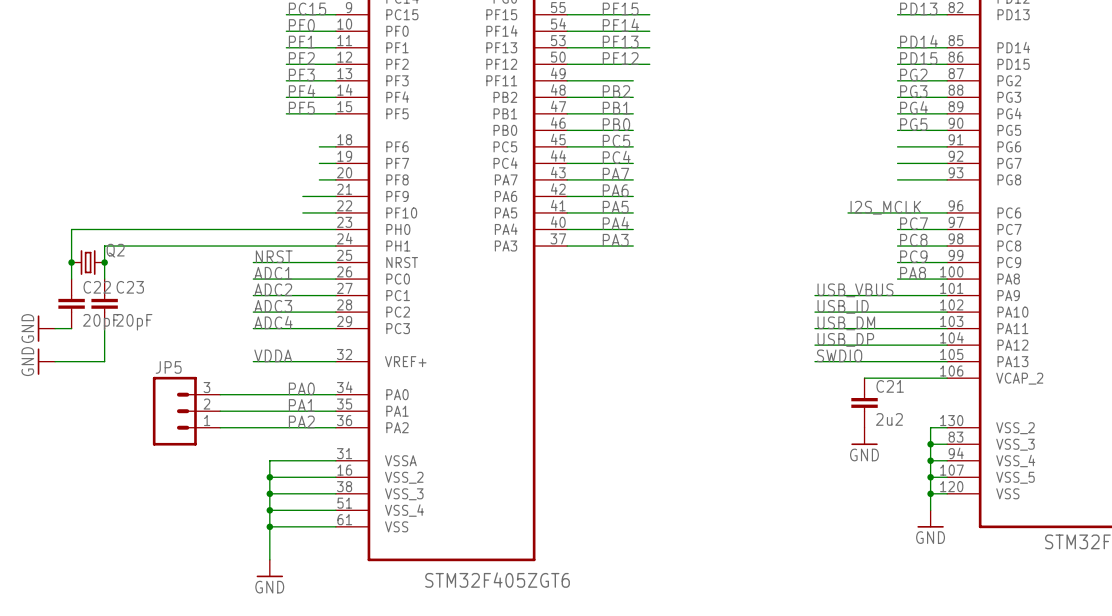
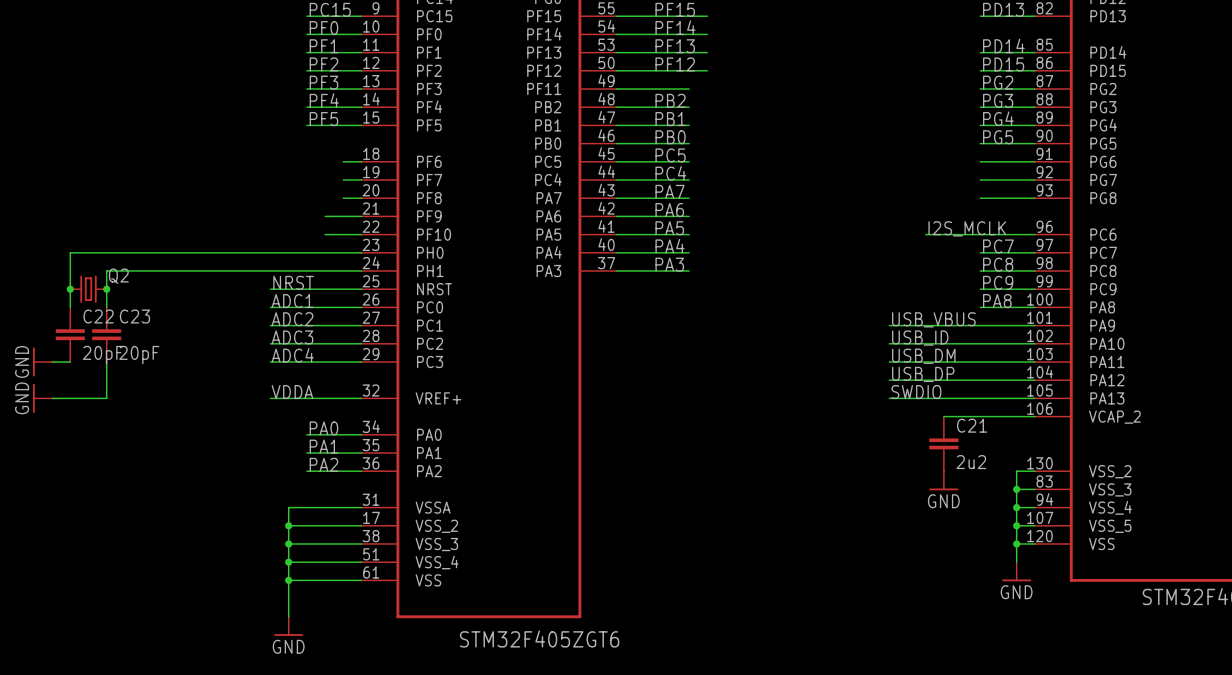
wire: (220, 394) (286, 394) -> none
JP5: (186, 411) -> none
wire: (220, 411) (286, 411) -> none
wire: (220, 427) (286, 427) -> none
part pin number: 16 (344, 470) -> 17 (371, 517)

